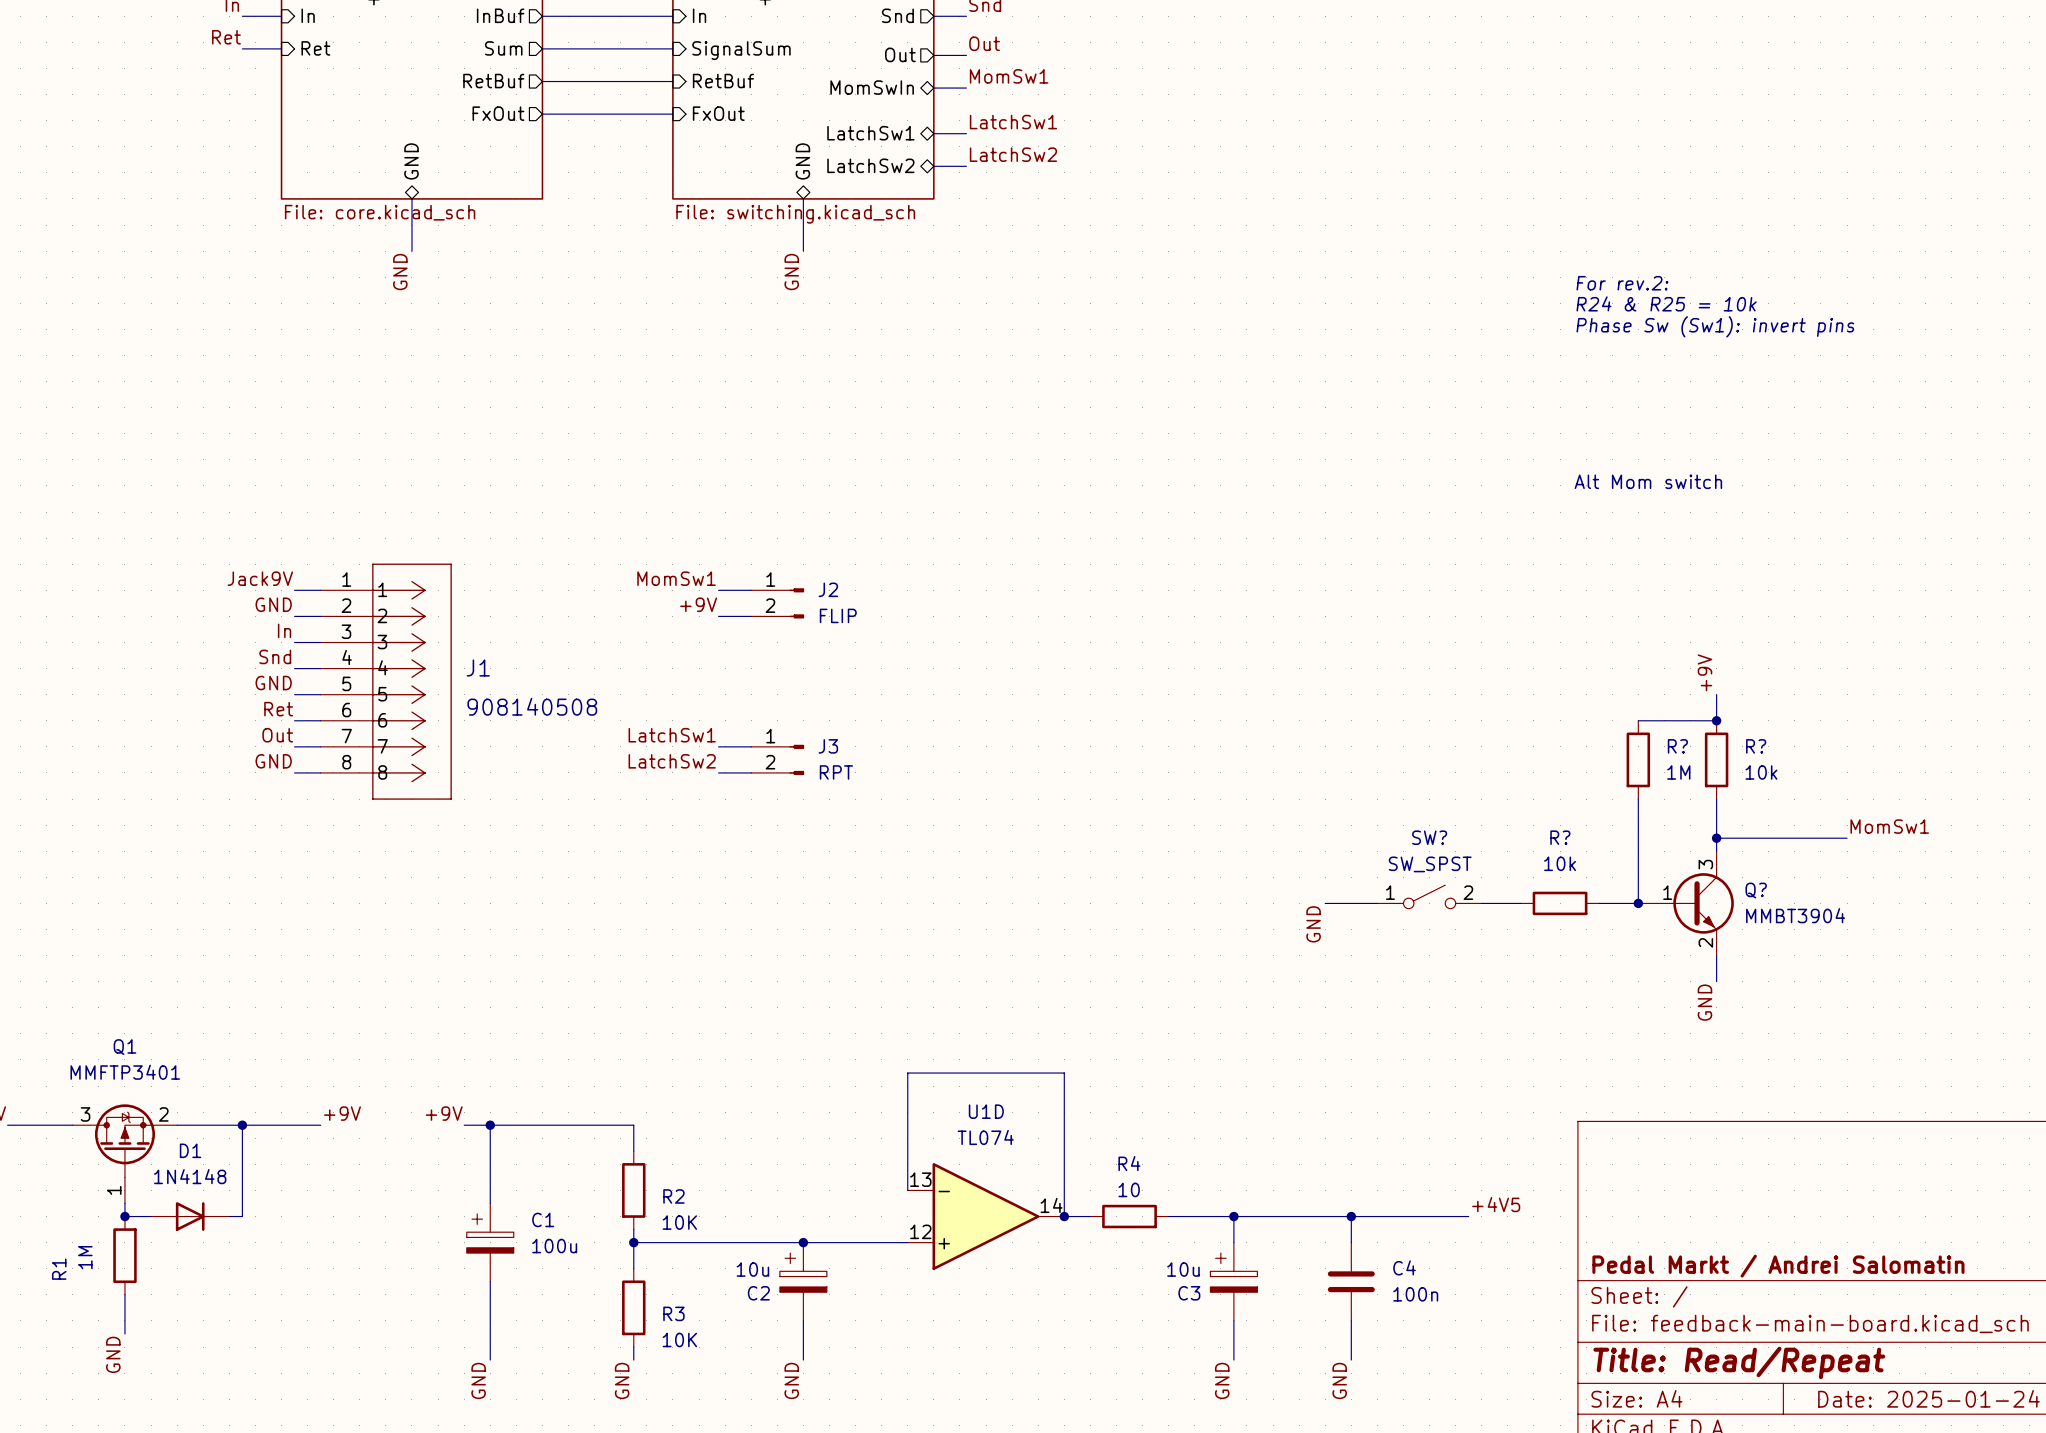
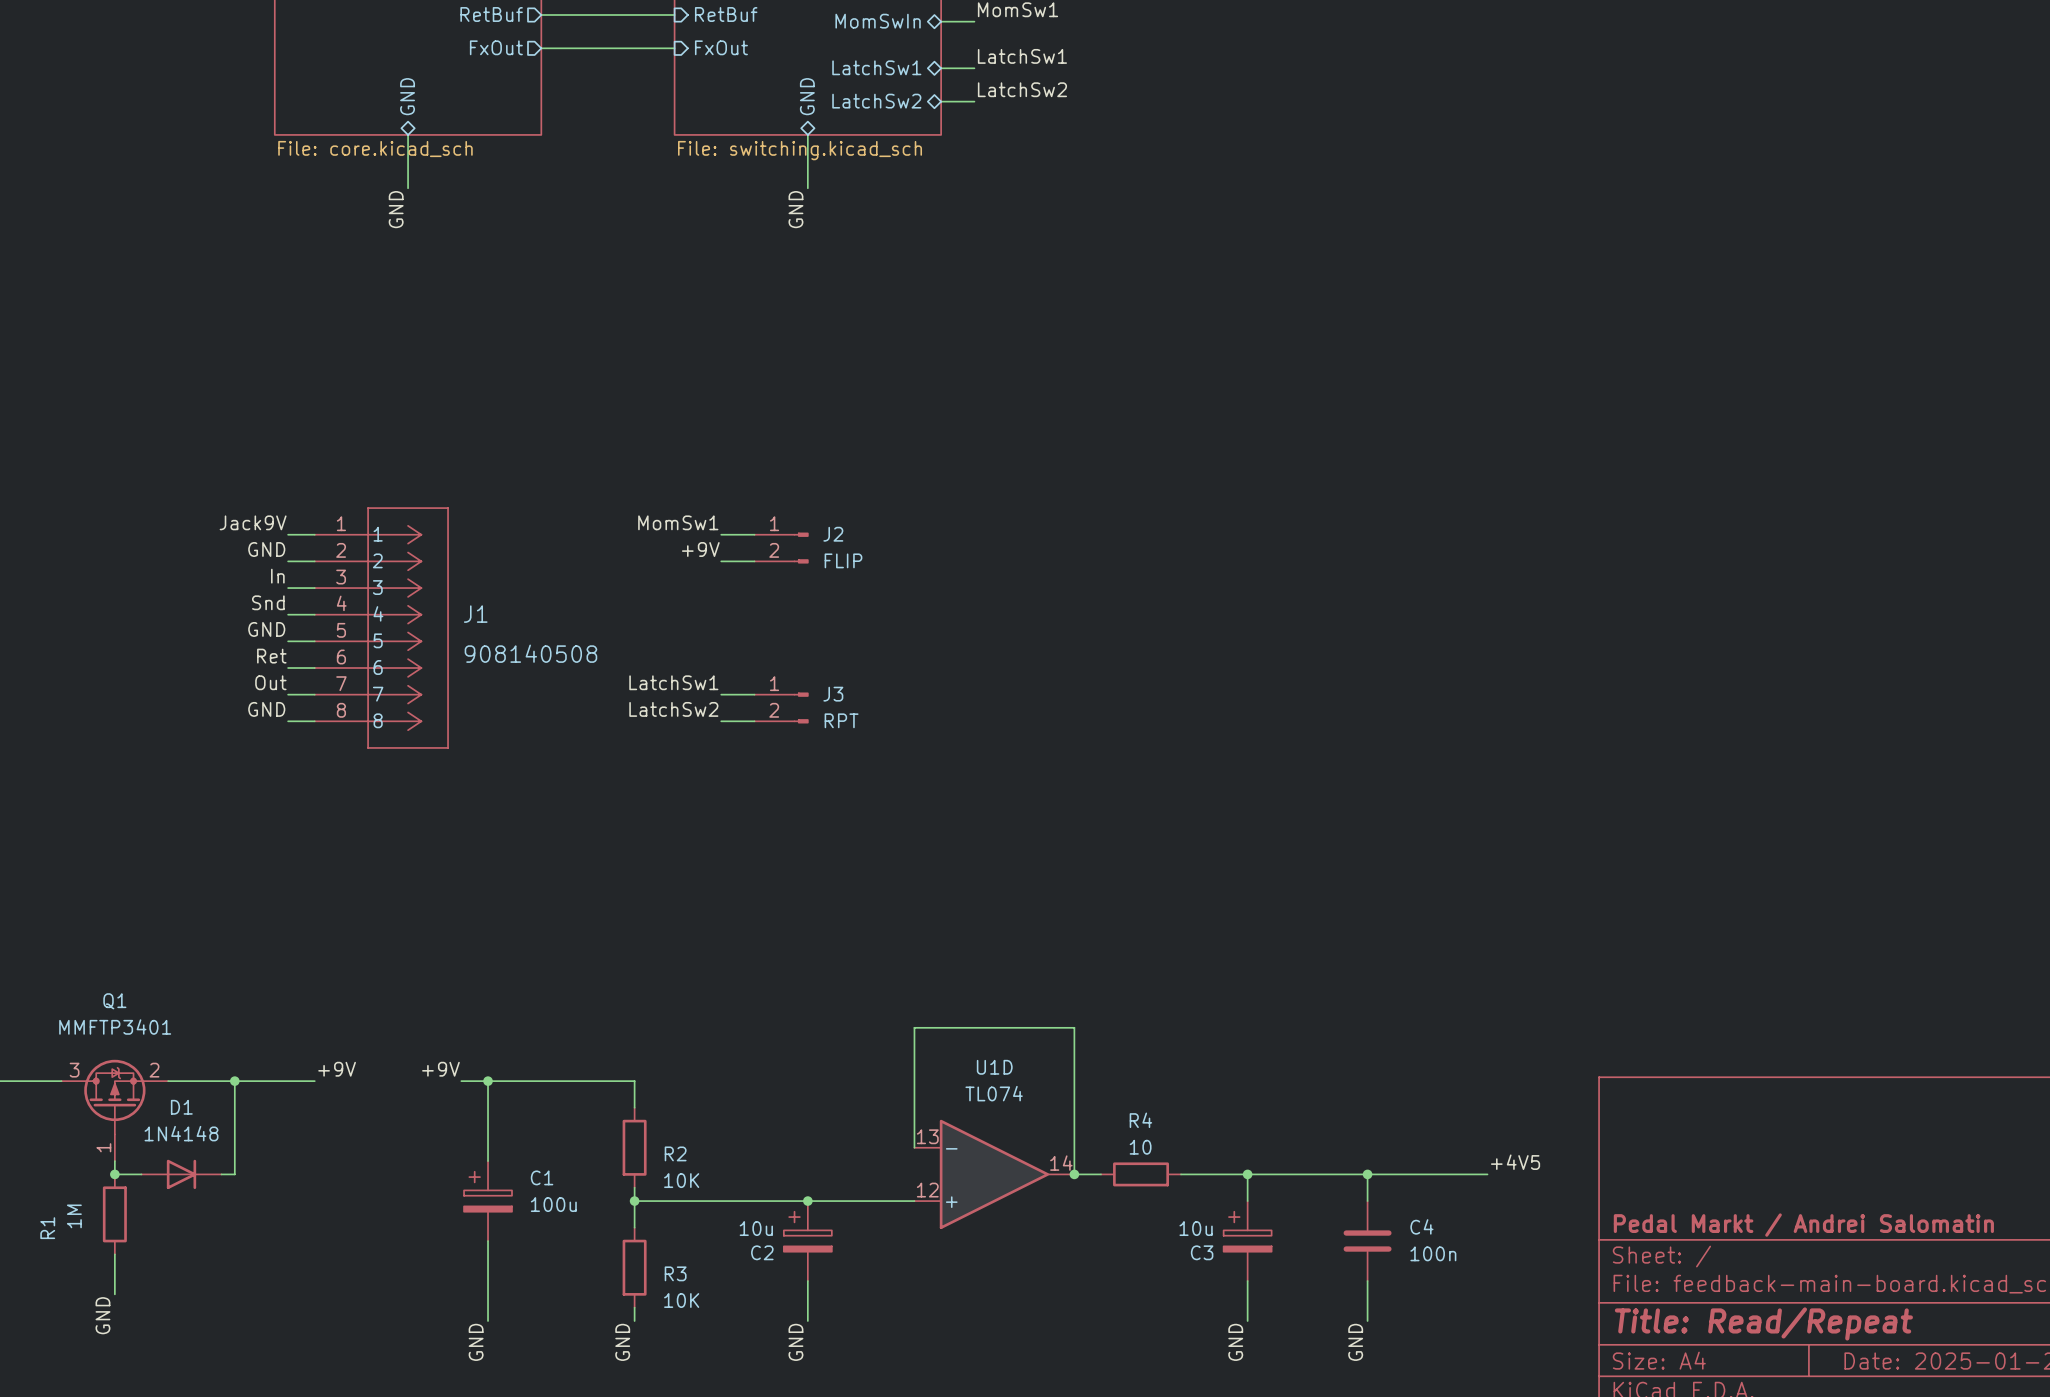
text: For rev.2: (1622, 283) -> none
text: R24 & R25 = 10k (1666, 303) -> none
text: Phase Sw (Sw1): invert pins (1715, 326) -> none
text: Alt Mom switch (1648, 481) -> none
label: +9V (1704, 672) -> none
wire: (1716, 694) (1716, 720) (1638, 720) -> none
junction: (1716, 720) -> none
R?: 1M (1638, 759) -> none
R?: 10k (1716, 759) -> none
wire: (1638, 799) (1638, 903) (1599, 903) -> none
wire: (1716, 799) (1716, 851) -> none
label: MomSw1 (1889, 826) -> none
wire: (1716, 838) (1847, 838) -> none
junction: (1716, 838) -> none
SW?: SW_SPST (1429, 896) -> none
wire: (1325, 903) (1377, 903) -> none
wire: (1481, 903) (1520, 903) -> none
R?: 10k (1560, 903) -> none
junction: (1638, 903) -> none
Q?: MMBT3904 (1686, 903) -> none
label: GND (1313, 924) -> none
wire: (1716, 955) (1716, 981) -> none
label: GND (1704, 1002) -> none

